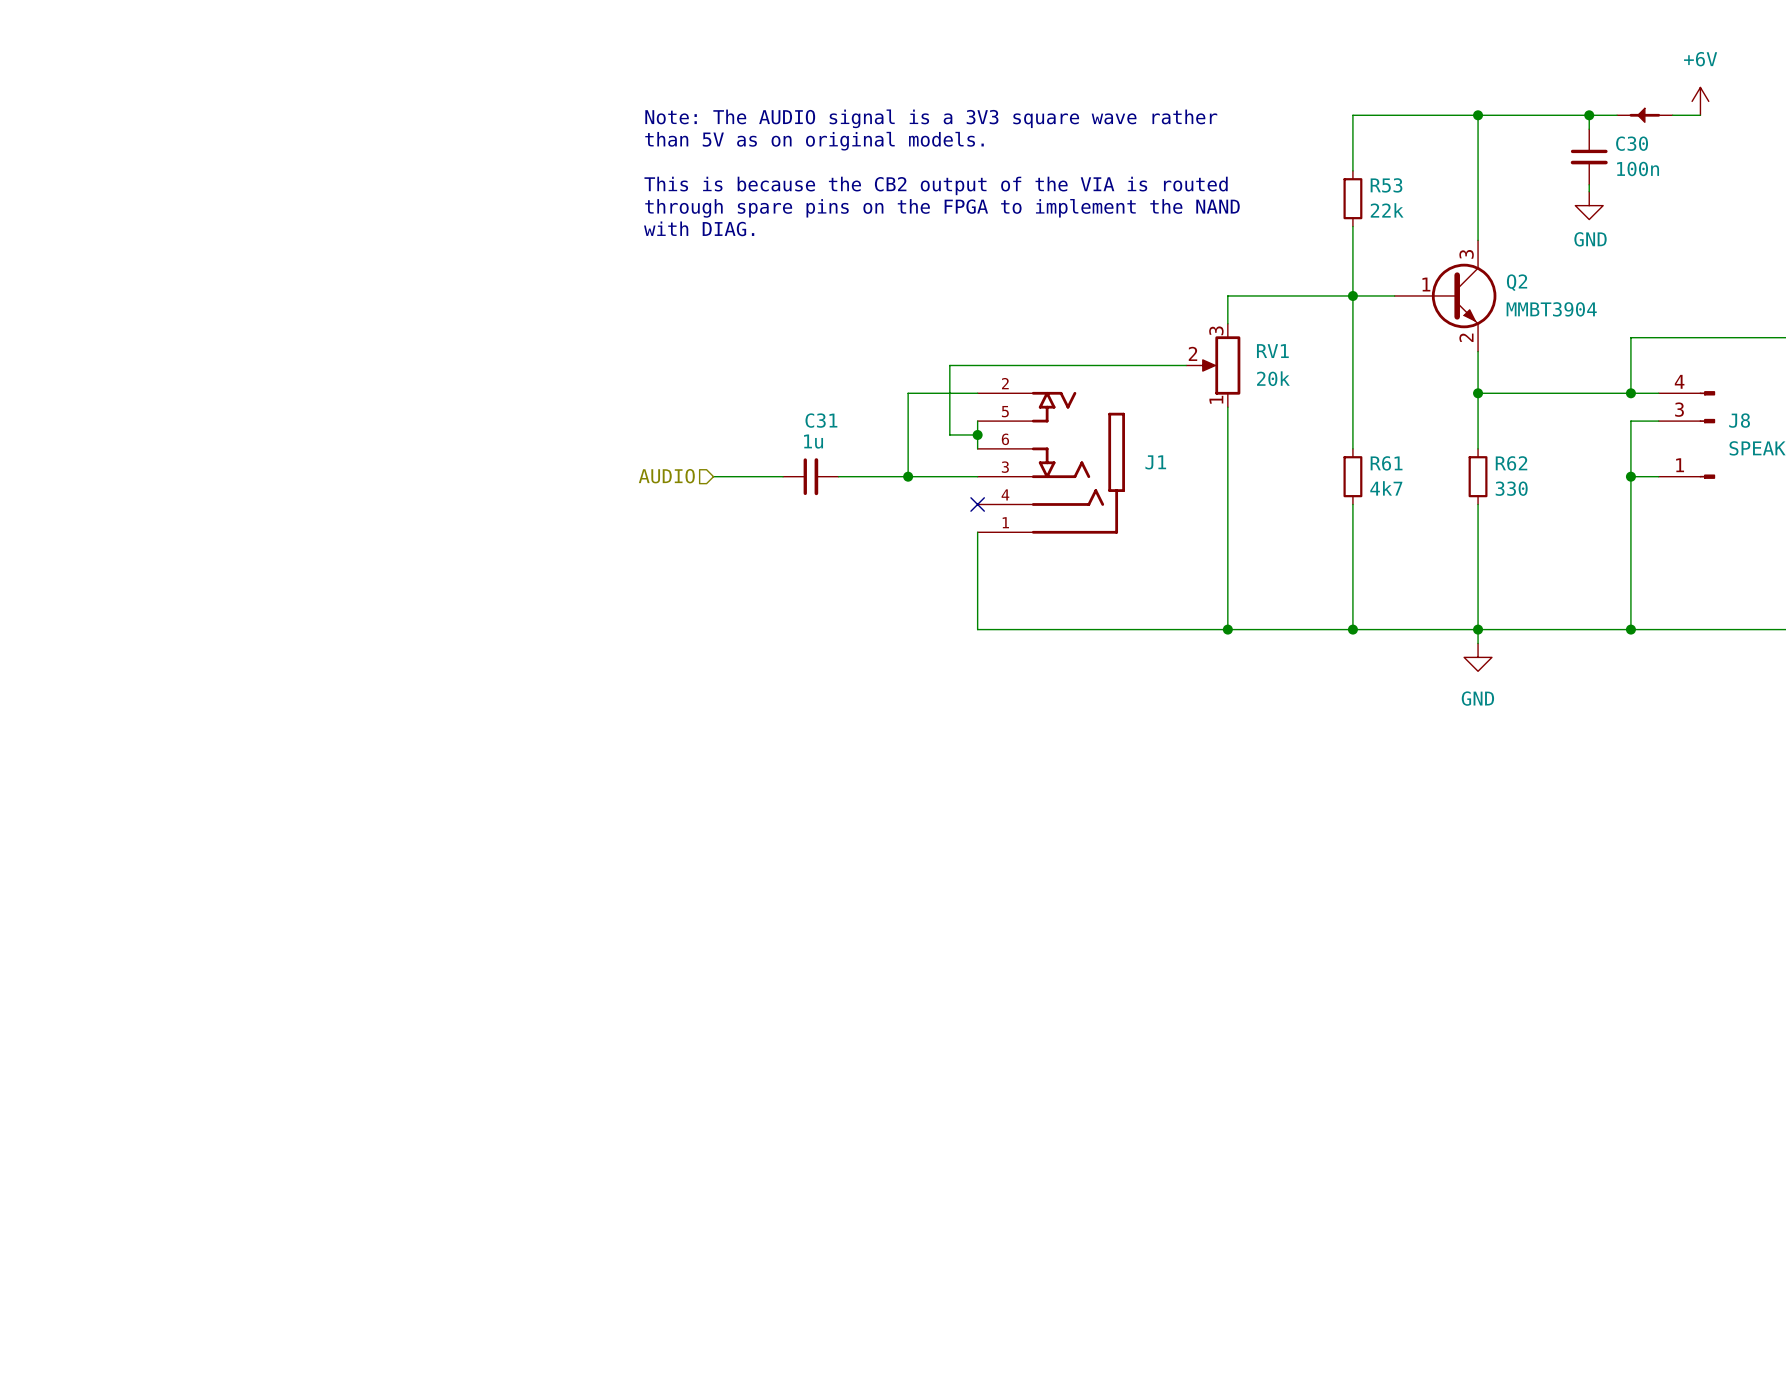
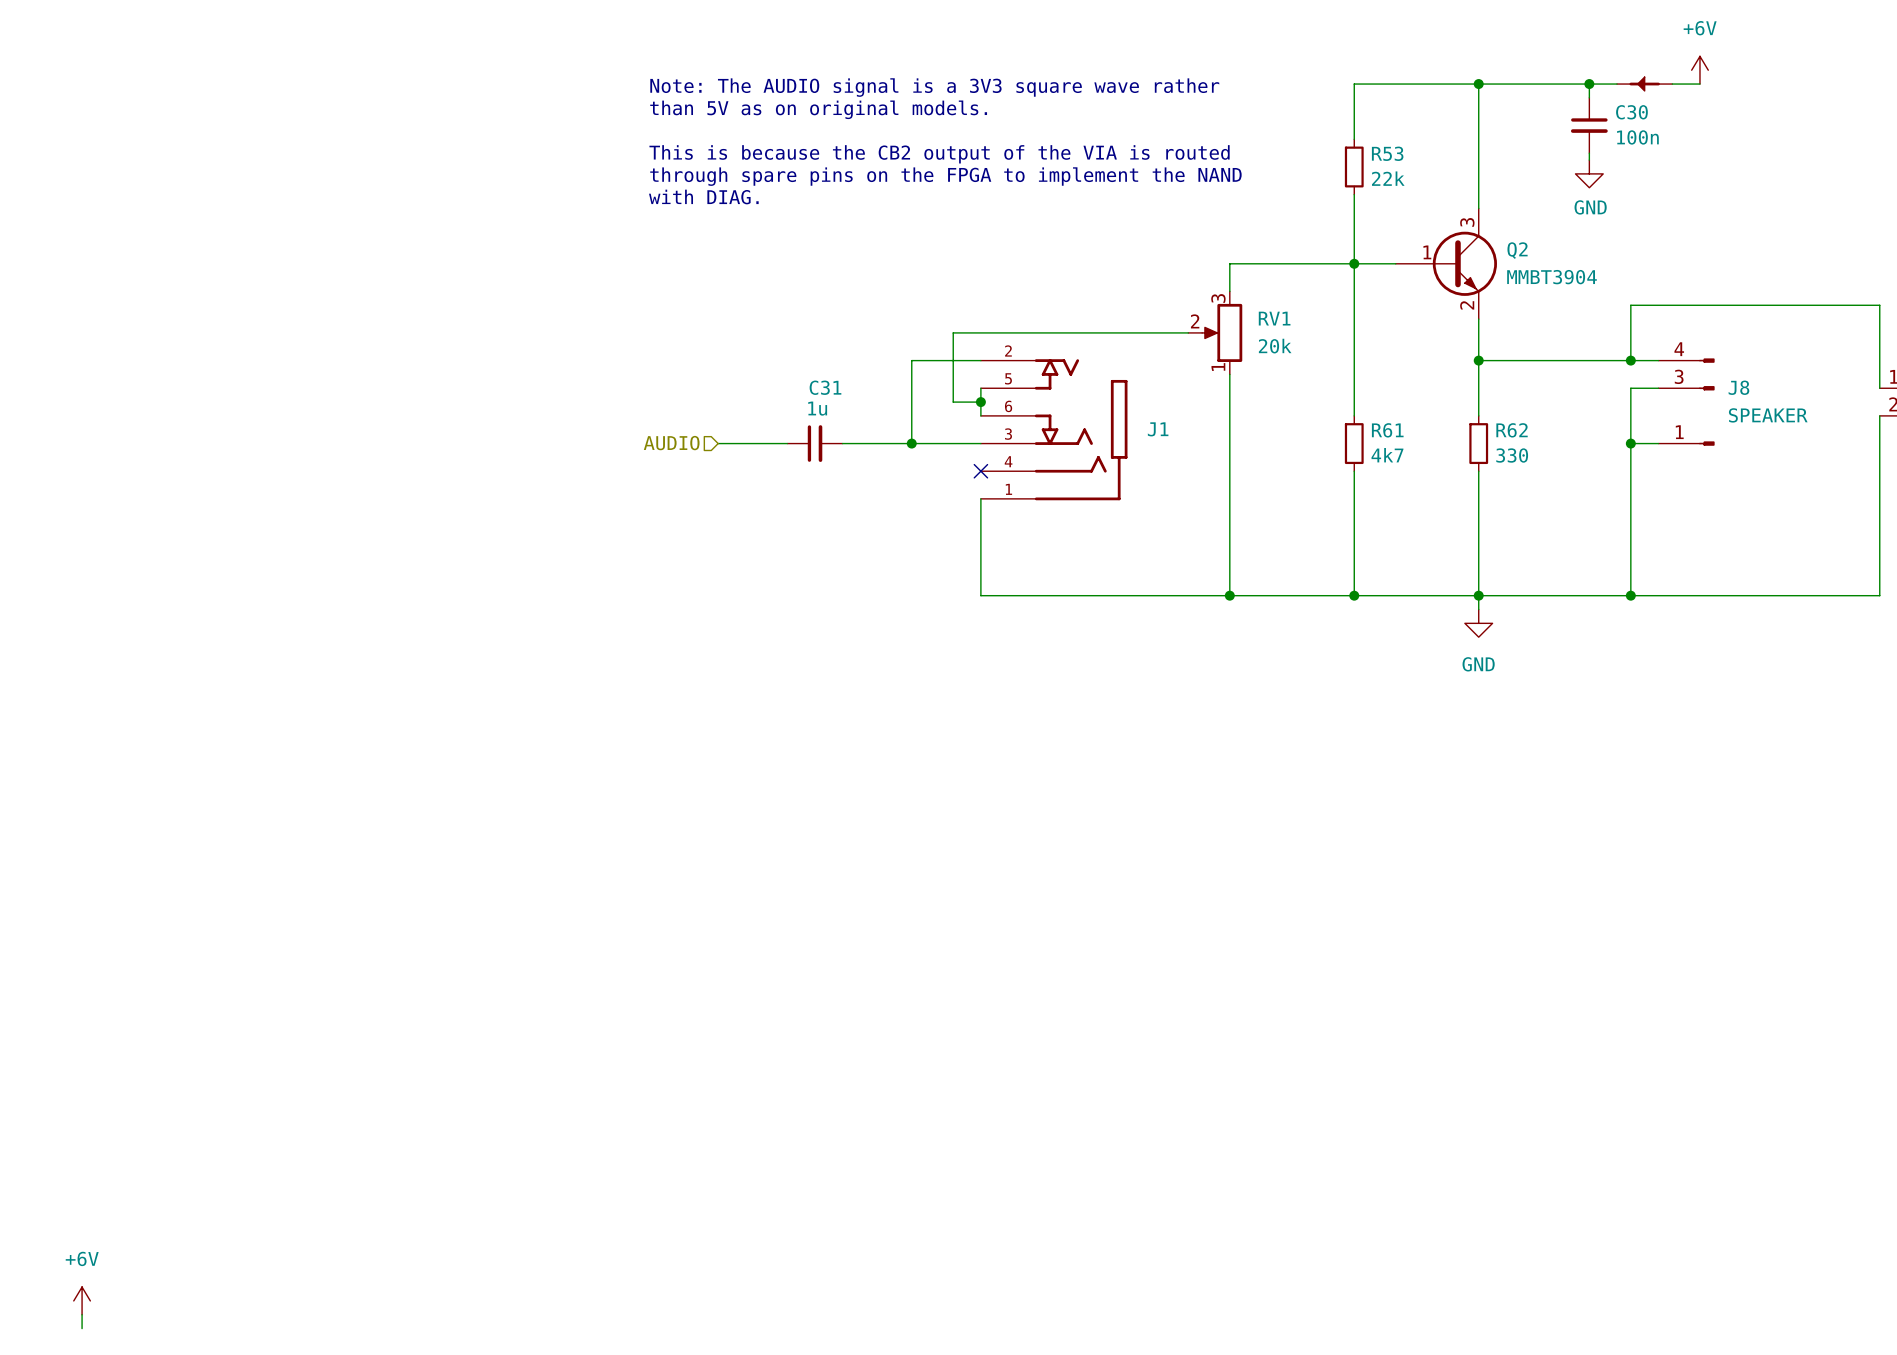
power symbol: none -> +6V (82, 1300)
wire: none -> (82, 1314) (82, 1328)

